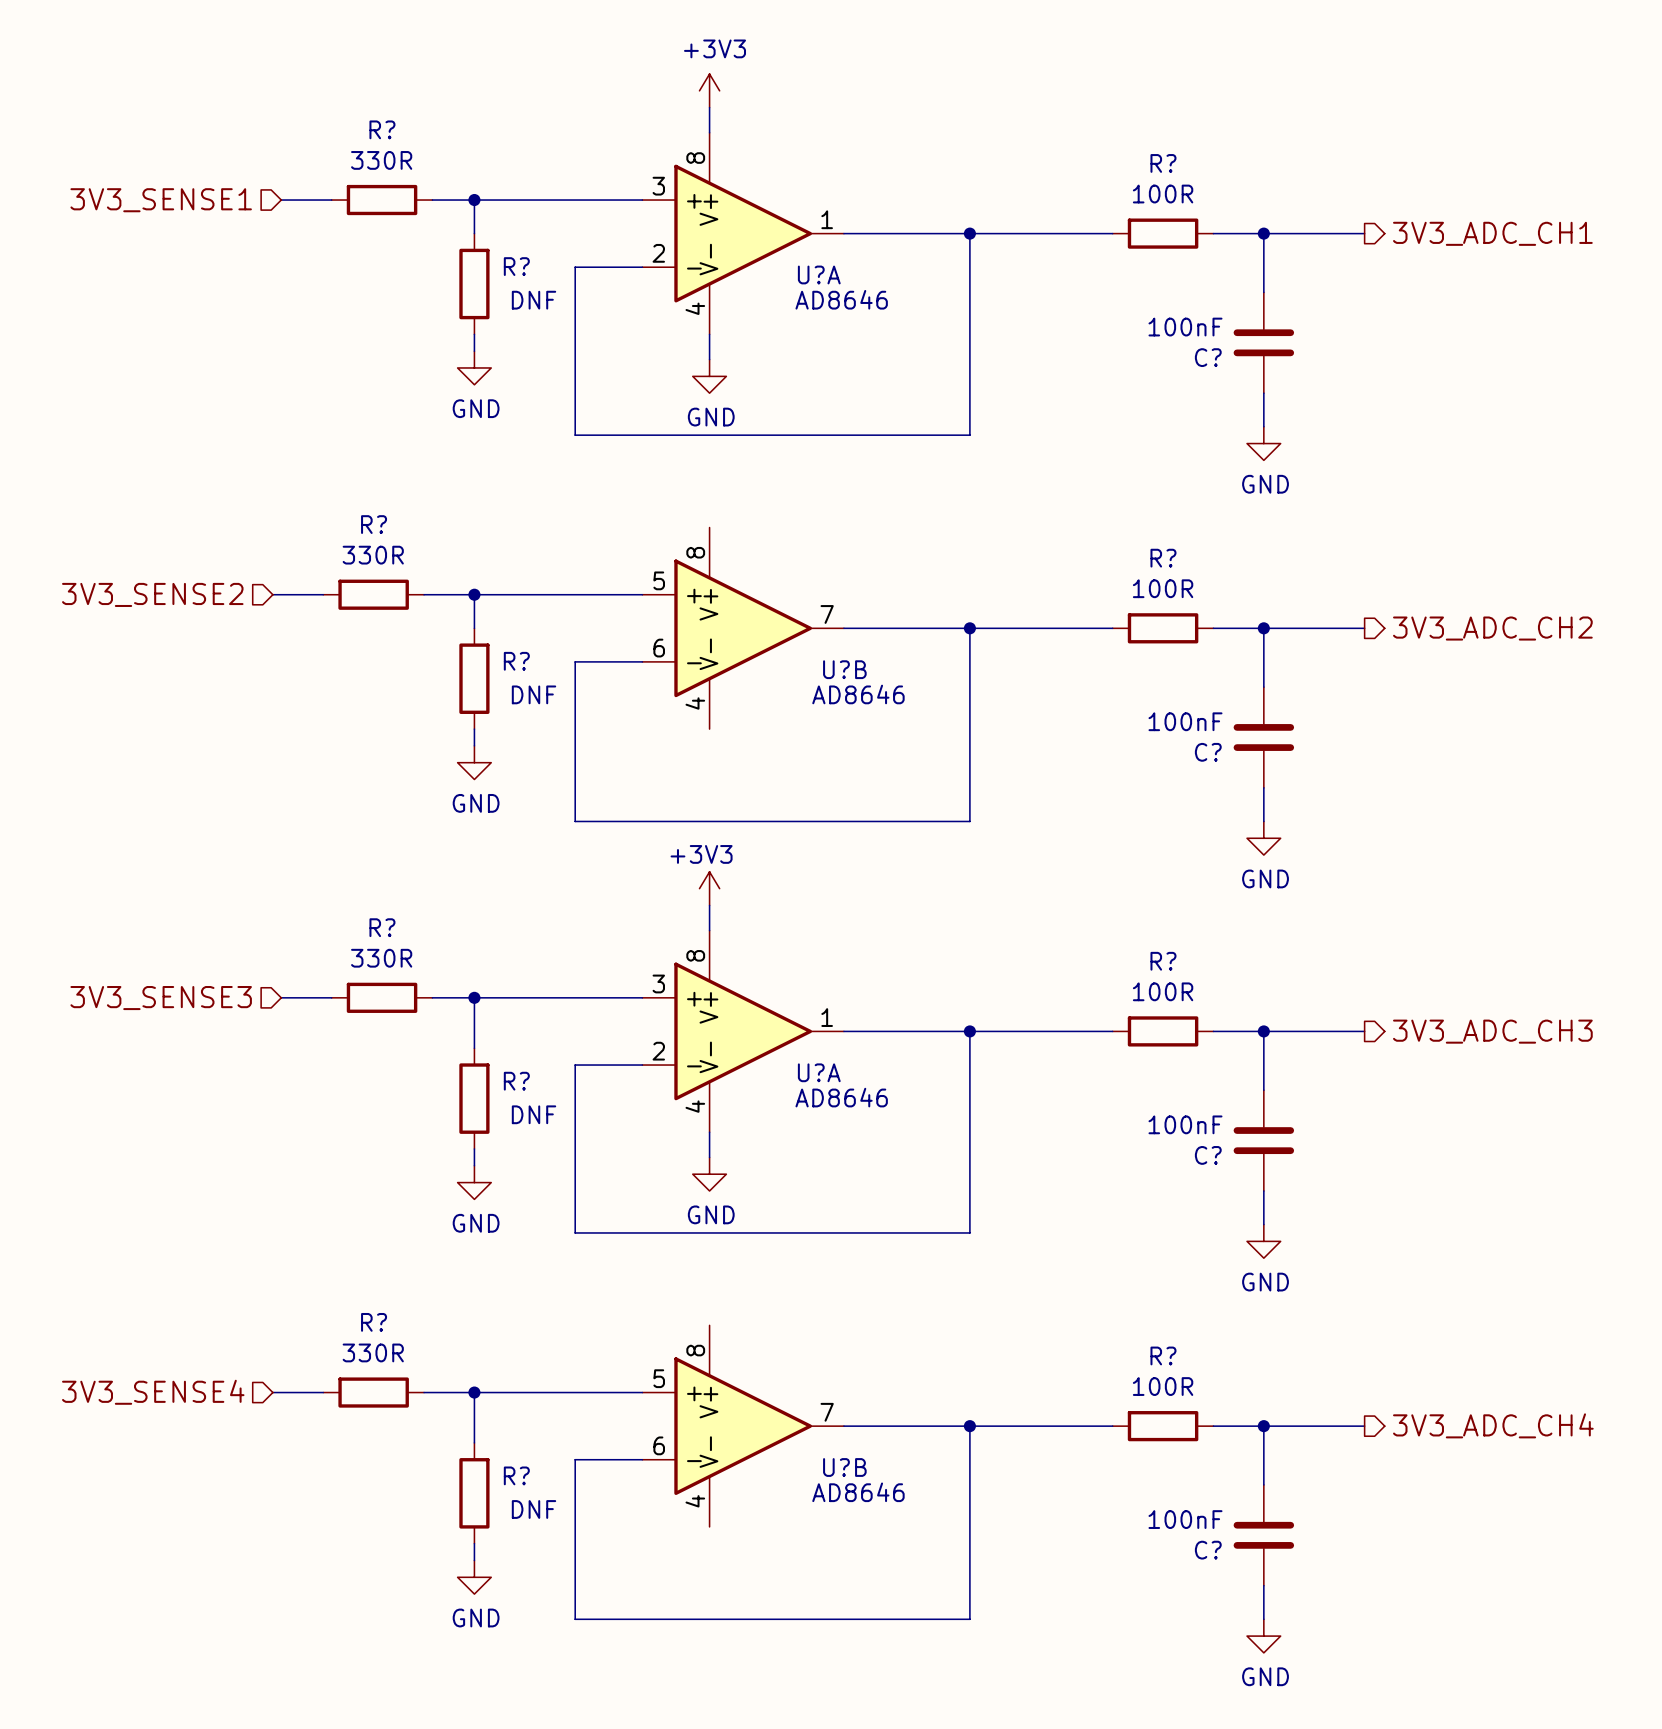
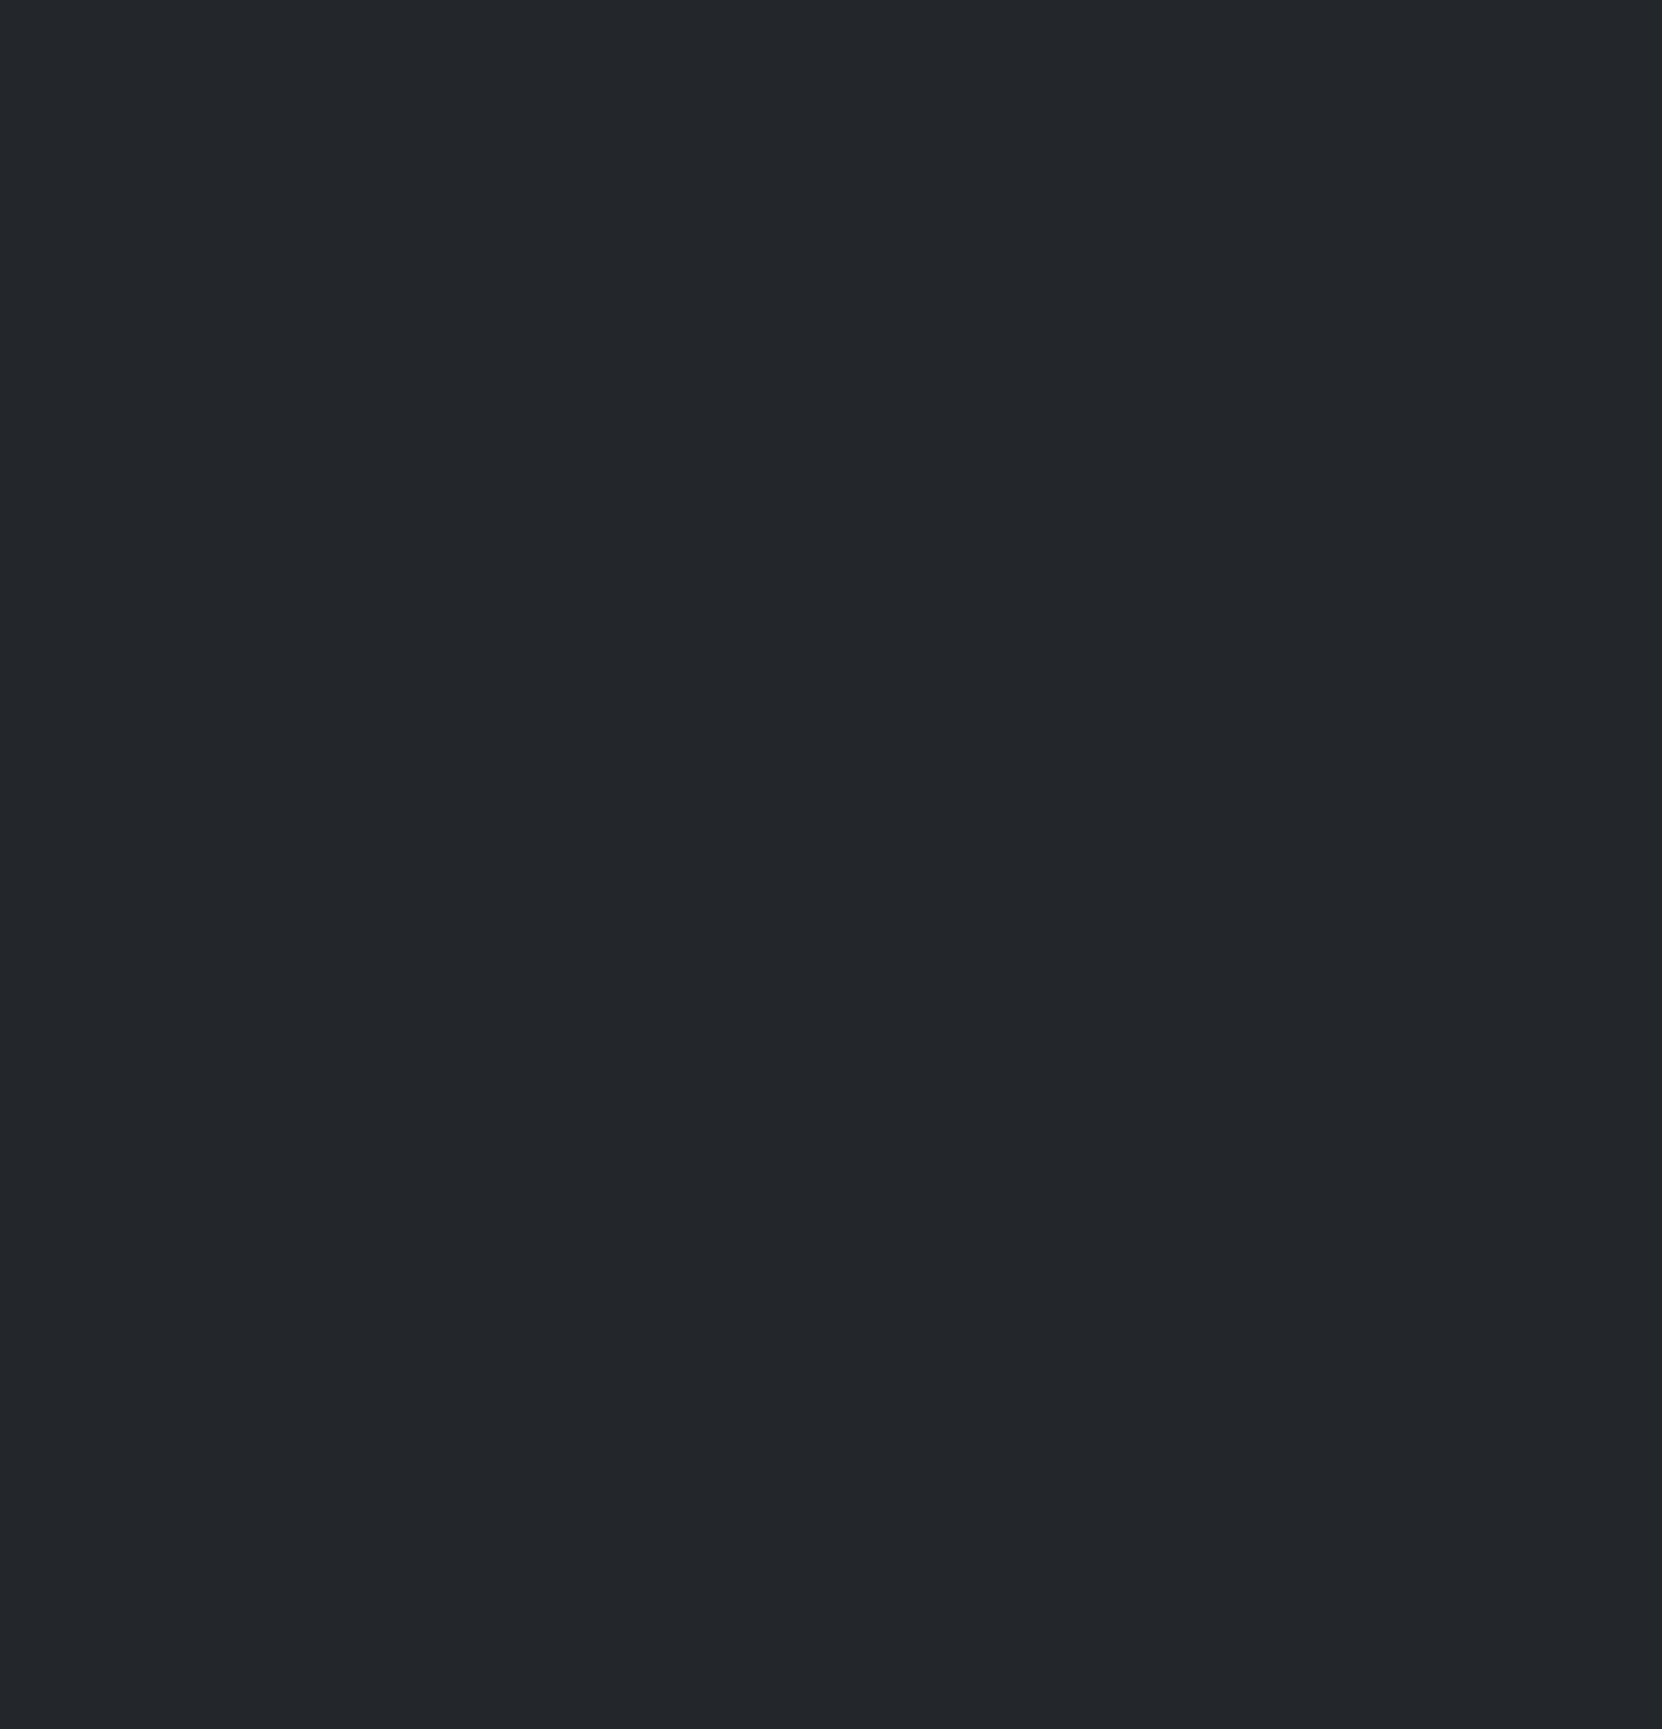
power symbol: +3V3 (709, 90) -> none
wire: (709, 107) (709, 132) -> none
hierarchical label: 3V3_SENSE1 (161, 200) -> none
wire: (281, 200) (331, 200) -> none
R?: 330R (382, 200) -> none
wire: (432, 200) (642, 200) -> none
wire: (474, 200) (474, 233) -> none
junction: (474, 200) -> none
U?A: AD8646 (743, 233) -> none
wire: (843, 233) (1112, 233) -> none
wire: (969, 233) (969, 435) (575, 435) (575, 267) (642, 267) -> none
junction: (969, 233) -> none
R?: 100R (1163, 233) -> none
wire: (1213, 233) (1364, 233) -> none
wire: (1263, 233) (1263, 292) -> none
junction: (1263, 233) -> none
hierarchical label: 3V3_ADC_CH1 (1492, 233) -> none
R?: DNF (474, 284) -> none
wire: (474, 334) (474, 351) -> none
wire: (709, 334) (709, 359) -> none
C?: 100nF (1263, 342) -> none
power symbol: GND (474, 367) -> none
power symbol: GND (709, 376) -> none
wire: (1263, 393) (1263, 426) -> none
power symbol: GND (1263, 443) -> none
hierarchical label: 3V3_SENSE2 (152, 594) -> none
wire: (272, 594) (323, 594) -> none
R?: 330R (373, 594) -> none
wire: (424, 594) (642, 594) -> none
wire: (474, 594) (474, 628) -> none
junction: (474, 594) -> none
U?B: AD8646 (743, 628) -> none
wire: (843, 628) (1112, 628) -> none
wire: (969, 628) (969, 821) (575, 821) (575, 661) (642, 661) -> none
junction: (969, 628) -> none
R?: 100R (1163, 628) -> none
wire: (1213, 628) (1364, 628) -> none
wire: (1263, 628) (1263, 687) -> none
junction: (1263, 628) -> none
hierarchical label: 3V3_ADC_CH2 (1492, 628) -> none
R?: DNF (474, 678) -> none
wire: (474, 729) (474, 745) -> none
C?: 100nF (1263, 737) -> none
power symbol: GND (474, 762) -> none
wire: (1263, 787) (1263, 821) -> none
power symbol: GND (1263, 838) -> none
power symbol: +3V3 (709, 888) -> none
wire: (709, 905) (709, 930) -> none
wire: (281, 997) (331, 997) -> none
R?: 330R (382, 997) -> none
wire: (432, 997) (642, 997) -> none
wire: (474, 997) (474, 1048) -> none
junction: (474, 997) -> none
hierarchical label: 3V3_SENSE3 (161, 998) -> none
U?A: AD8646 (743, 1031) -> none
wire: (843, 1031) (1112, 1031) -> none
wire: (969, 1031) (969, 1232) (575, 1232) (575, 1065) (642, 1065) -> none
junction: (969, 1031) -> none
R?: 100R (1163, 1031) -> none
wire: (1213, 1031) (1364, 1031) -> none
wire: (1263, 1031) (1263, 1090) -> none
junction: (1263, 1031) -> none
hierarchical label: 3V3_ADC_CH3 (1492, 1031) -> none
R?: DNF (474, 1098) -> none
wire: (709, 1132) (709, 1157) -> none
C?: 100nF (1263, 1140) -> none
wire: (474, 1149) (474, 1165) -> none
power symbol: GND (709, 1174) -> none
power symbol: GND (474, 1182) -> none
wire: (1263, 1190) (1263, 1224) -> none
power symbol: GND (1263, 1241) -> none
hierarchical label: 3V3_SENSE4 (153, 1392) -> none
wire: (272, 1392) (323, 1392) -> none
R?: 330R (373, 1392) -> none
wire: (424, 1392) (642, 1392) -> none
wire: (474, 1392) (474, 1442) -> none
junction: (474, 1392) -> none
hierarchical label: 3V3_ADC_CH4 (1493, 1425) -> none
U?B: AD8646 (743, 1426) -> none
wire: (843, 1426) (1112, 1426) -> none
wire: (969, 1426) (969, 1619) (575, 1619) (575, 1459) (642, 1459) -> none
junction: (969, 1426) -> none
R?: 100R (1163, 1426) -> none
wire: (1213, 1426) (1364, 1426) -> none
wire: (1263, 1426) (1263, 1484) -> none
junction: (1263, 1426) -> none
R?: DNF (474, 1493) -> none
C?: 100nF (1263, 1535) -> none
wire: (474, 1543) (474, 1560) -> none
power symbol: GND (474, 1577) -> none
wire: (1263, 1585) (1263, 1619) -> none
power symbol: GND (1263, 1636) -> none

